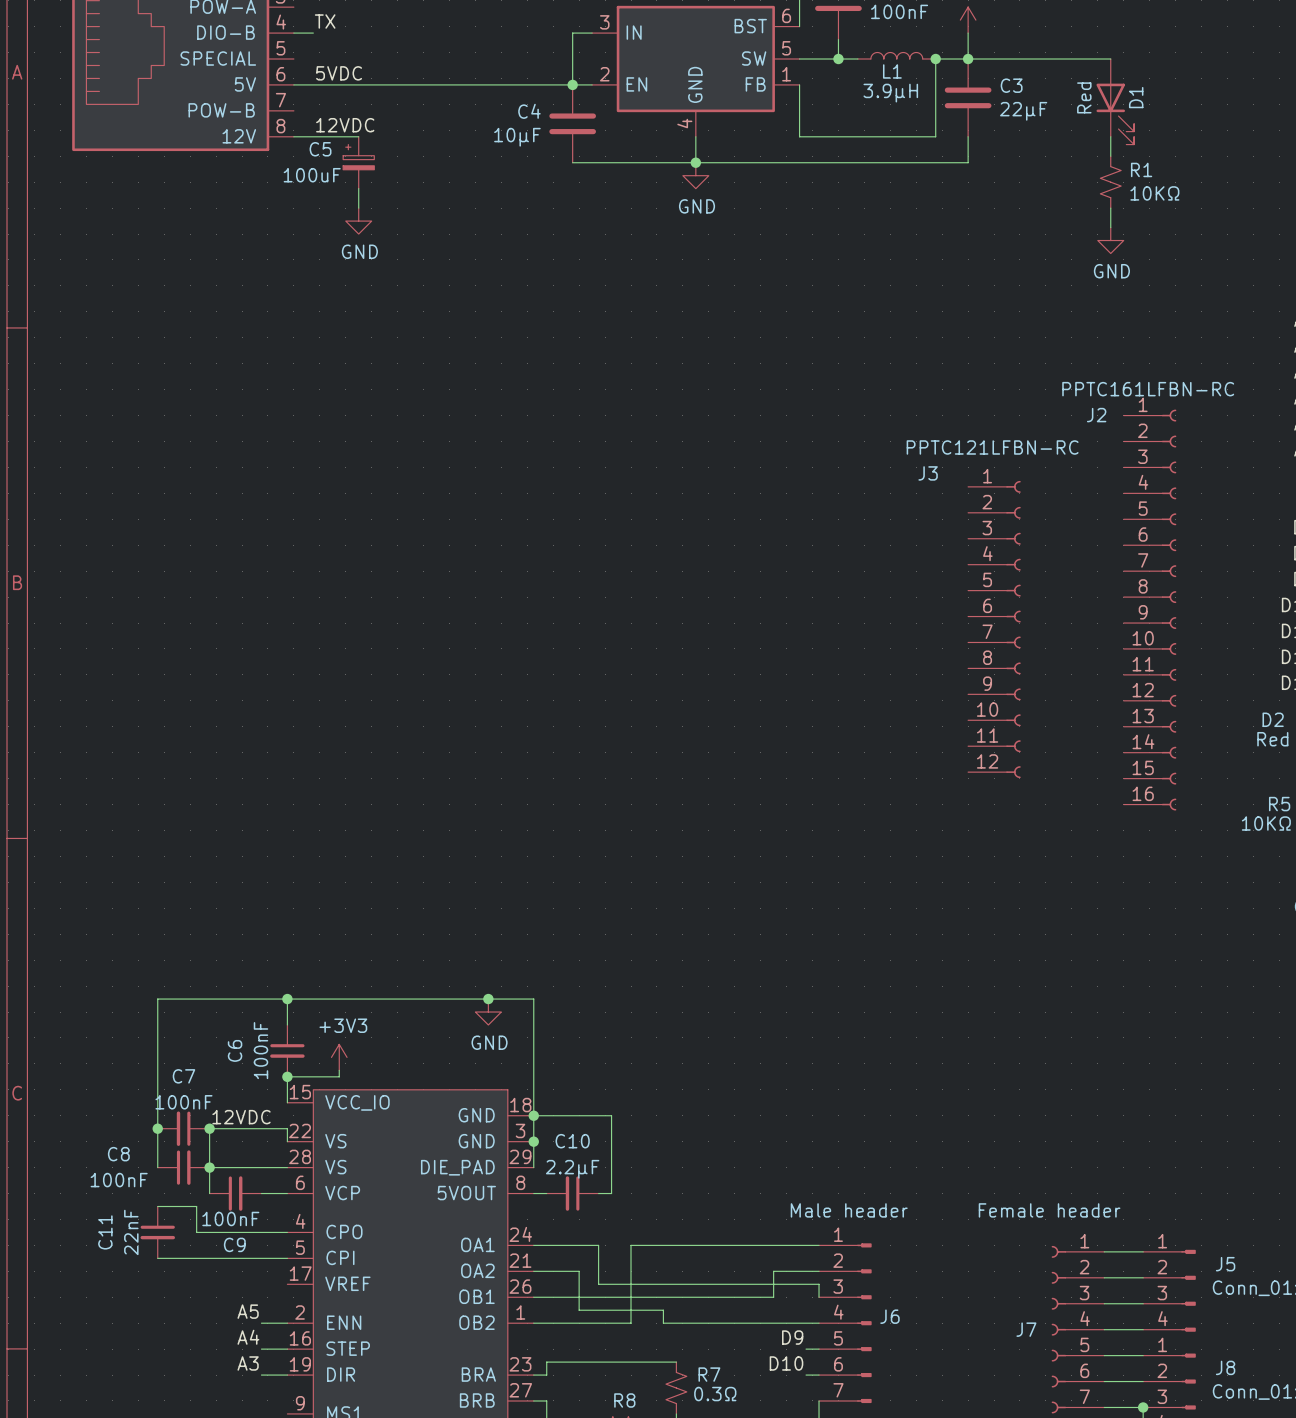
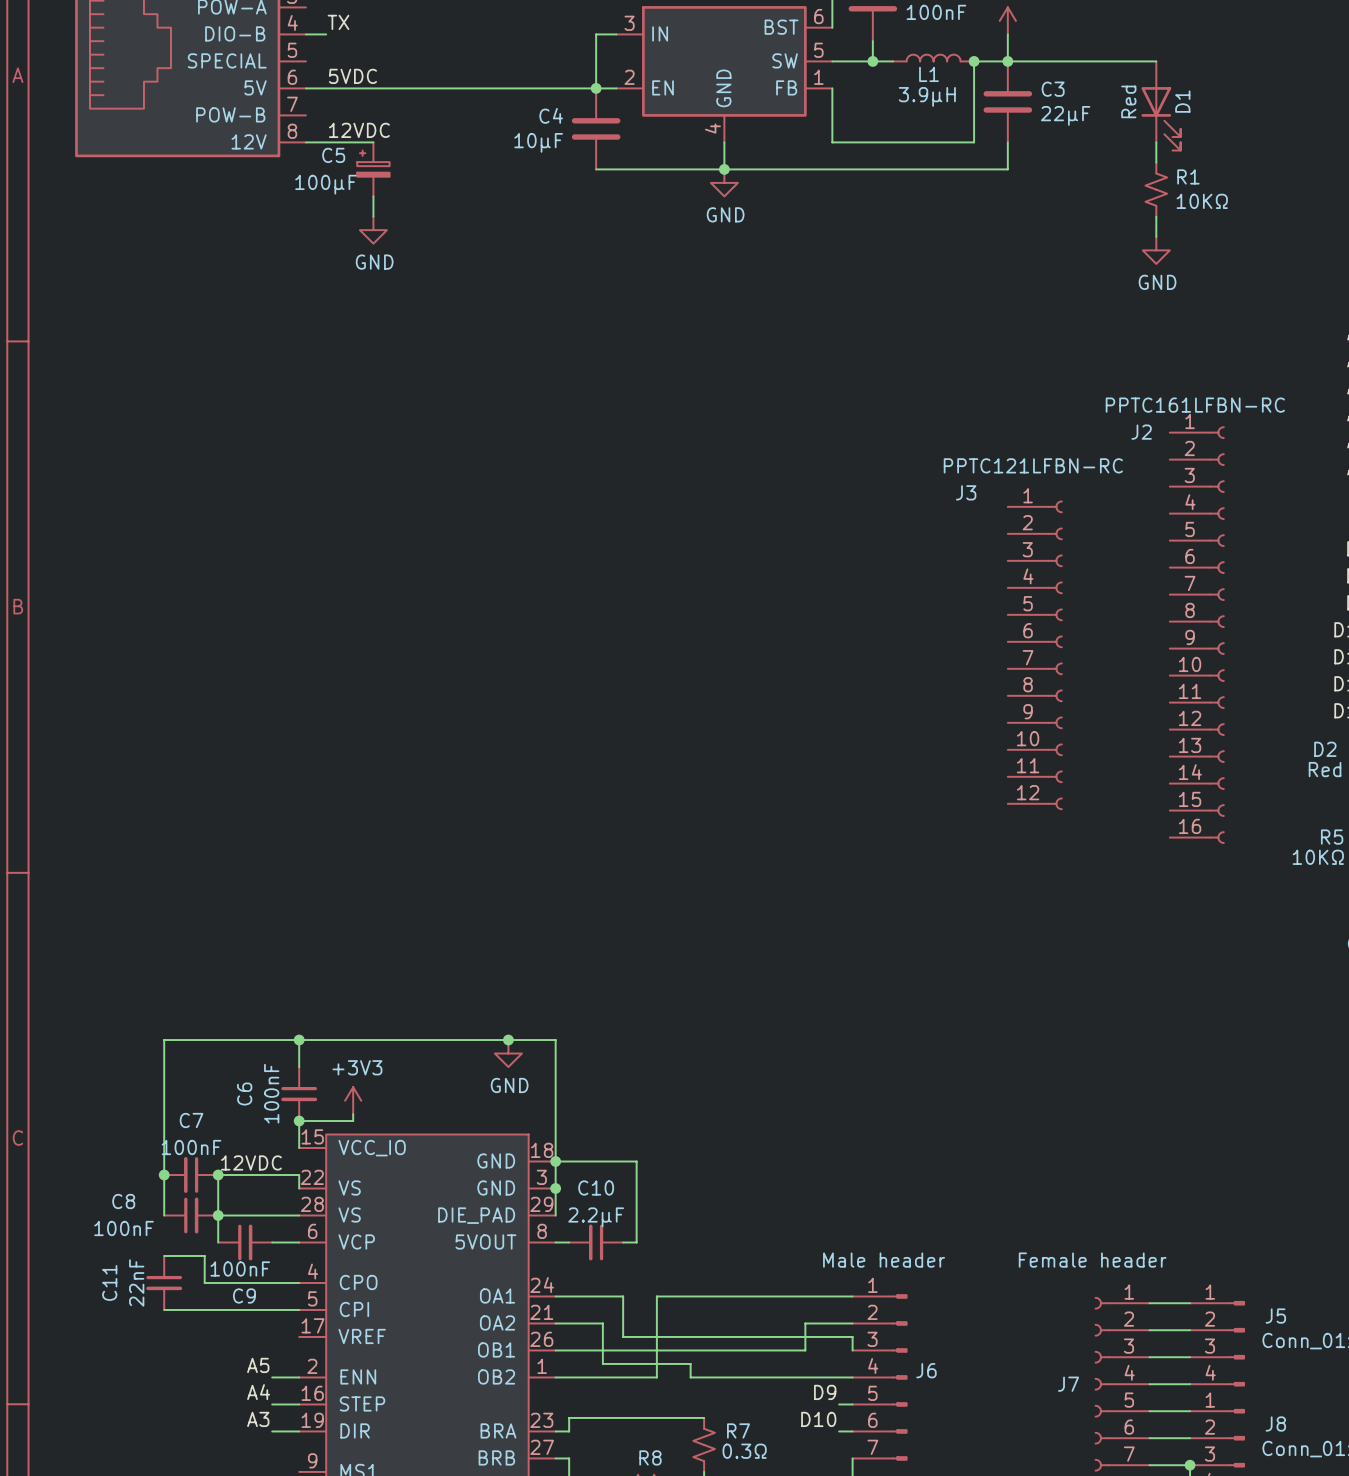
C5 value: 100uF (312, 175) -> 100µF (325, 184)

